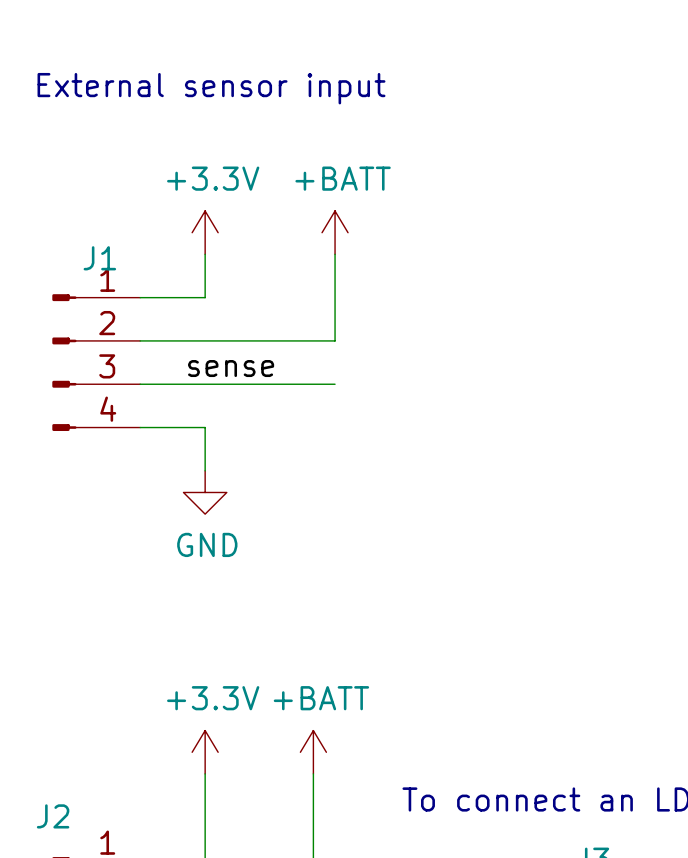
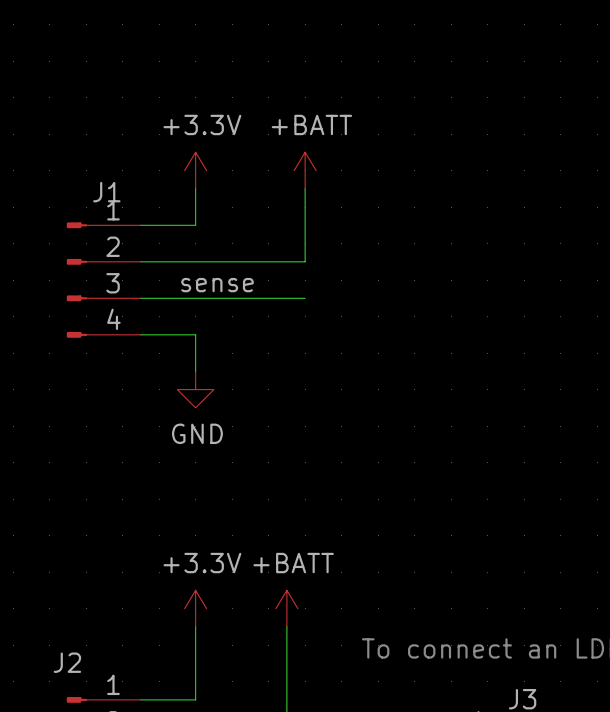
text: External sensor input (211, 88) -> none

